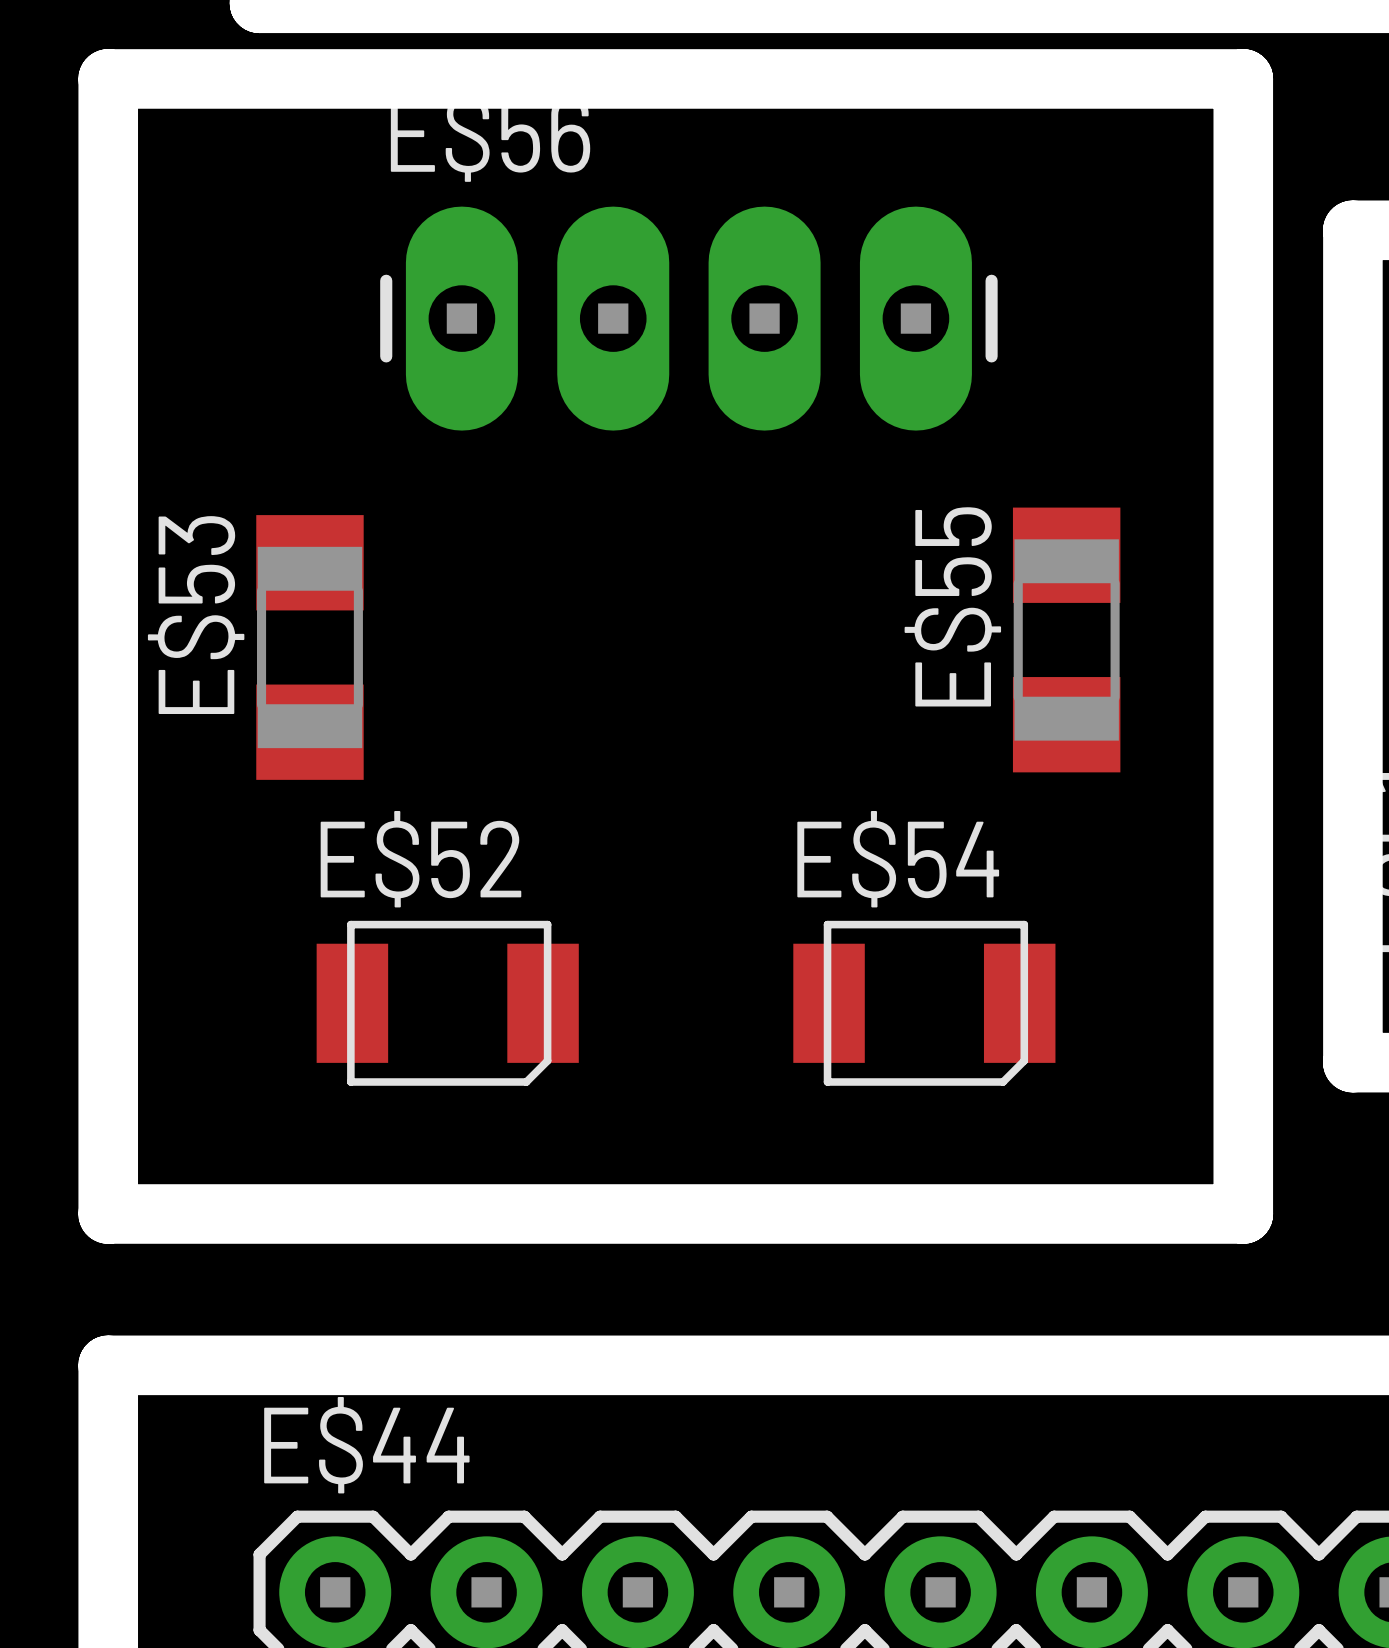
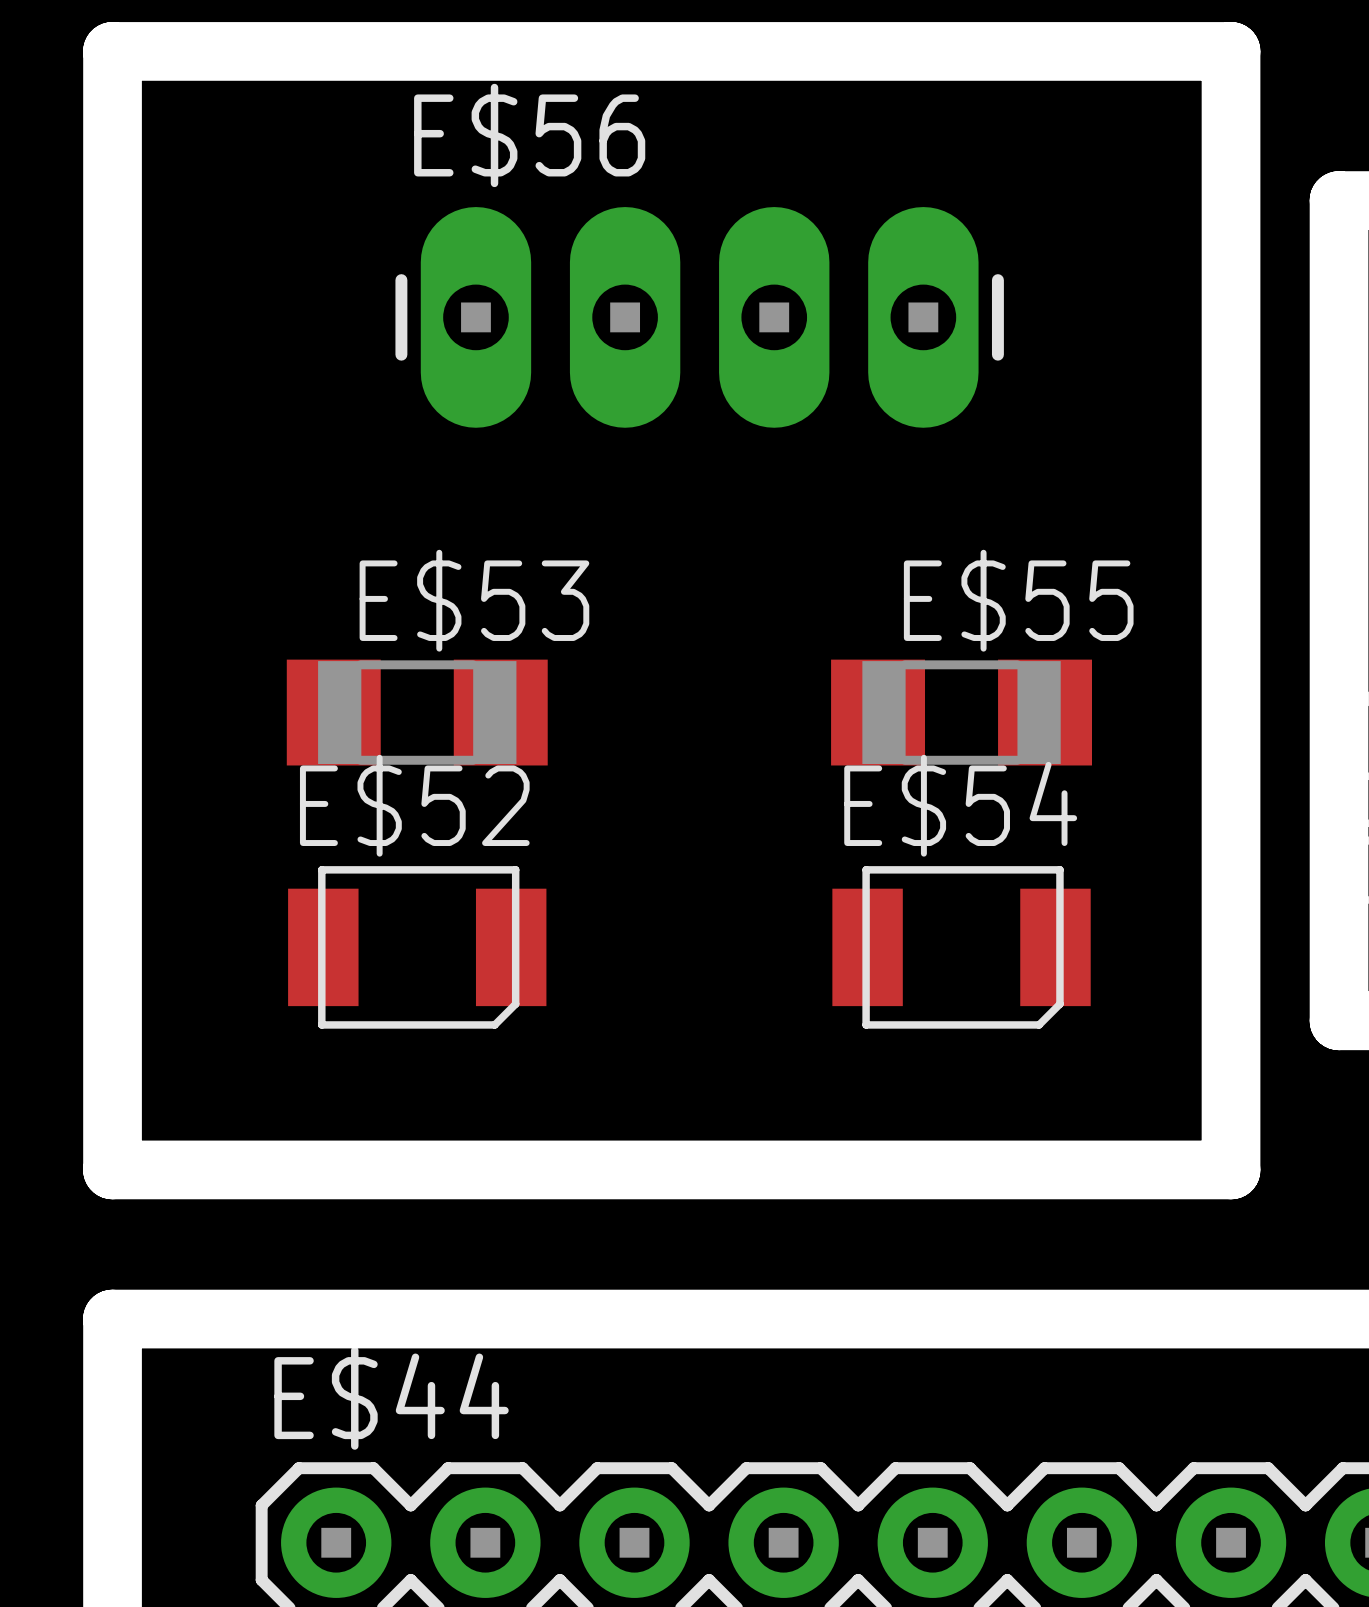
E$56 position: (688, 318) -> (699, 317)
E$55 rotation: 0° (1066, 639) -> 90° clockwise (961, 712)
E$53 rotation: 0° (309, 647) -> 90° clockwise (417, 712)
E$52 position: (447, 1003) -> (417, 947)
E$54 position: (924, 1003) -> (961, 947)

